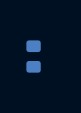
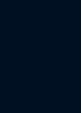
part: (33, 56) -> none

